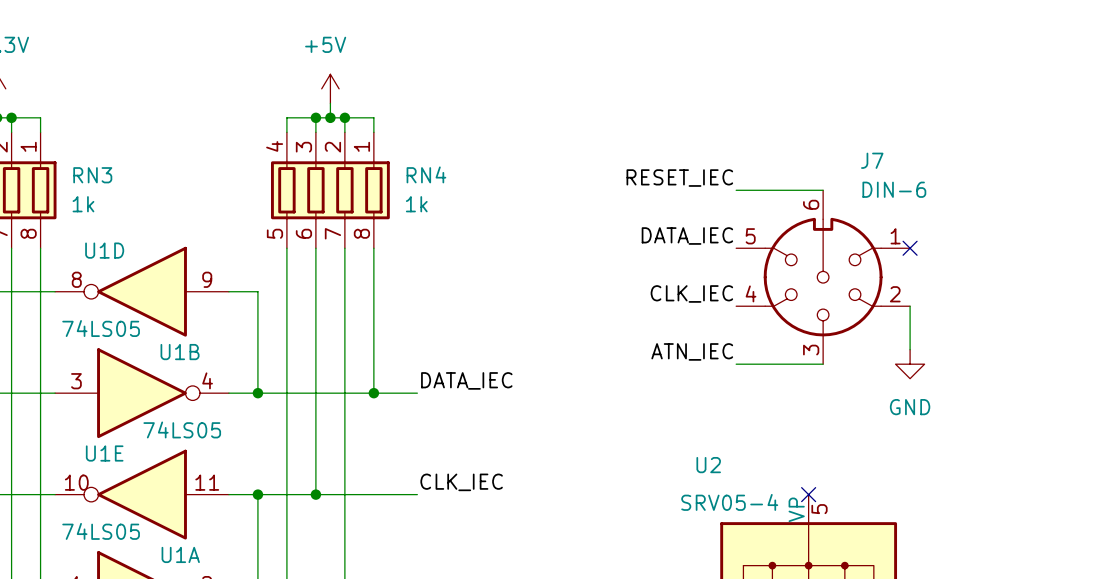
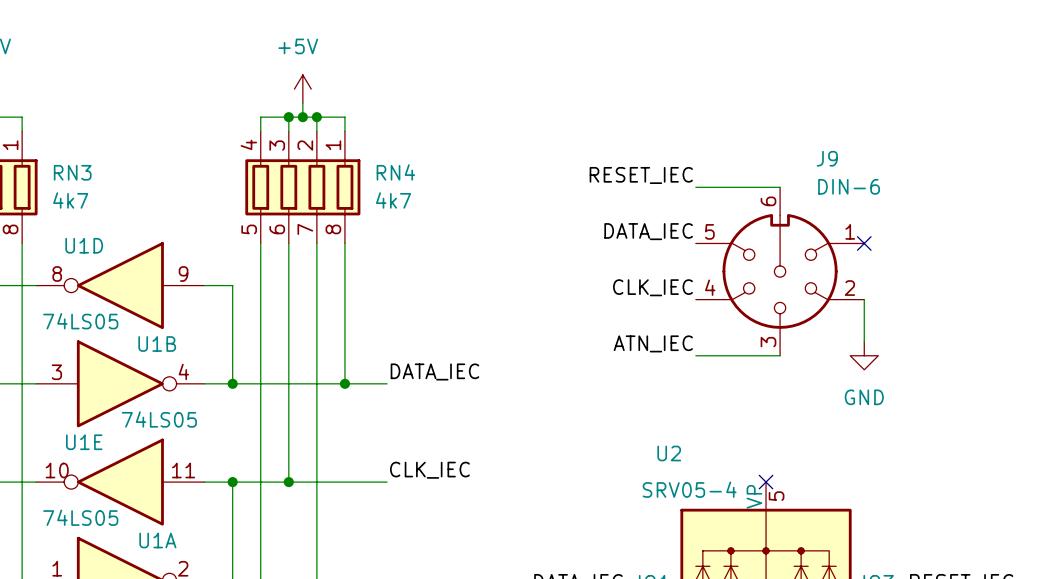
J7 name: J7 (872, 160) -> J9 (827, 158)
RN3 value: 1k (83, 204) -> 4k7 (70, 200)
RN4 value: 1k (416, 204) -> 4k7 (393, 200)

